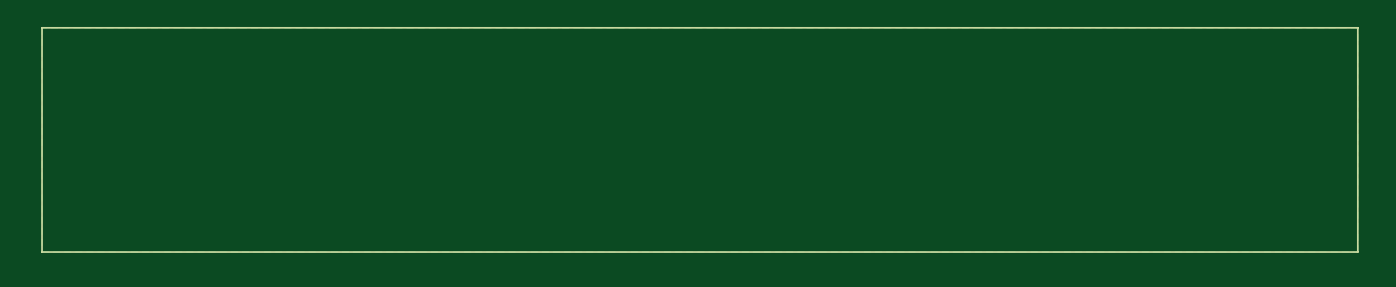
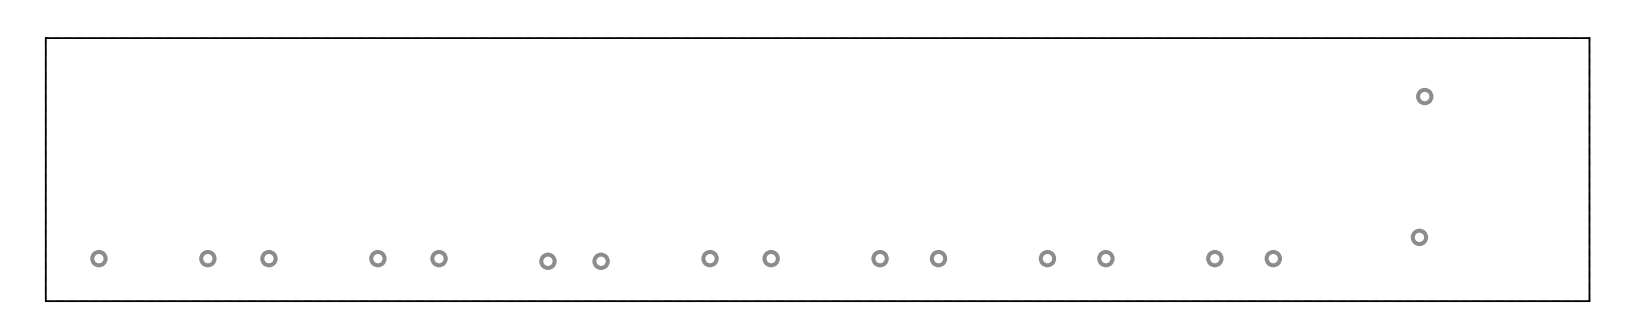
via: none -> (1424, 96)
via: none -> (1419, 237)
via: none -> (98, 258)
via: none -> (207, 258)
via: none -> (268, 258)
via: none -> (377, 258)
via: none -> (439, 258)
via: none -> (710, 258)
via: none -> (771, 258)
via: none -> (880, 258)
via: none -> (938, 258)
via: none -> (1047, 258)
via: none -> (1105, 258)
via: none -> (1214, 258)
via: none -> (1273, 258)
via: none -> (547, 261)
via: none -> (601, 261)

